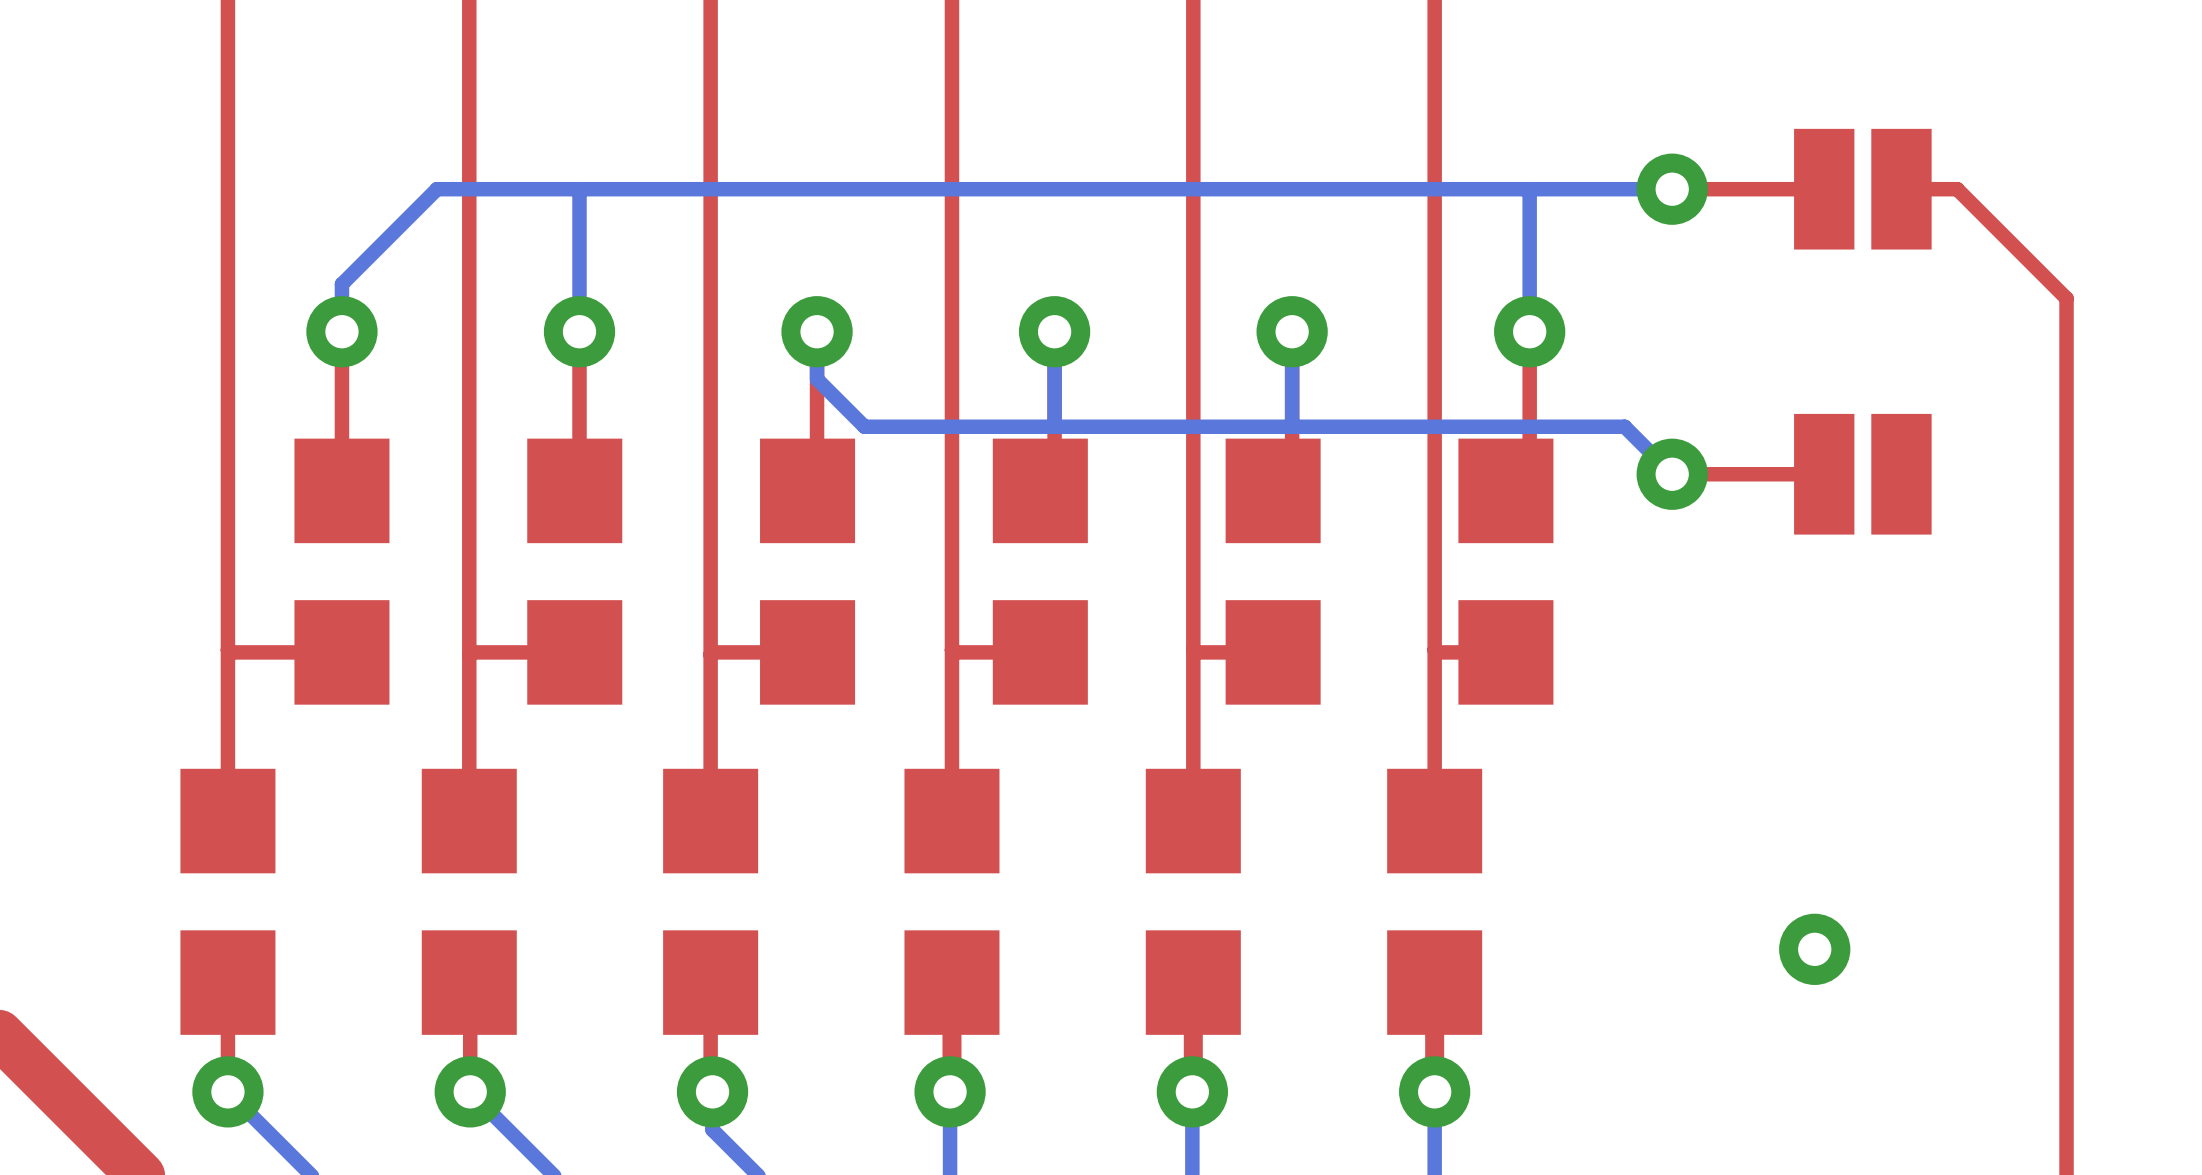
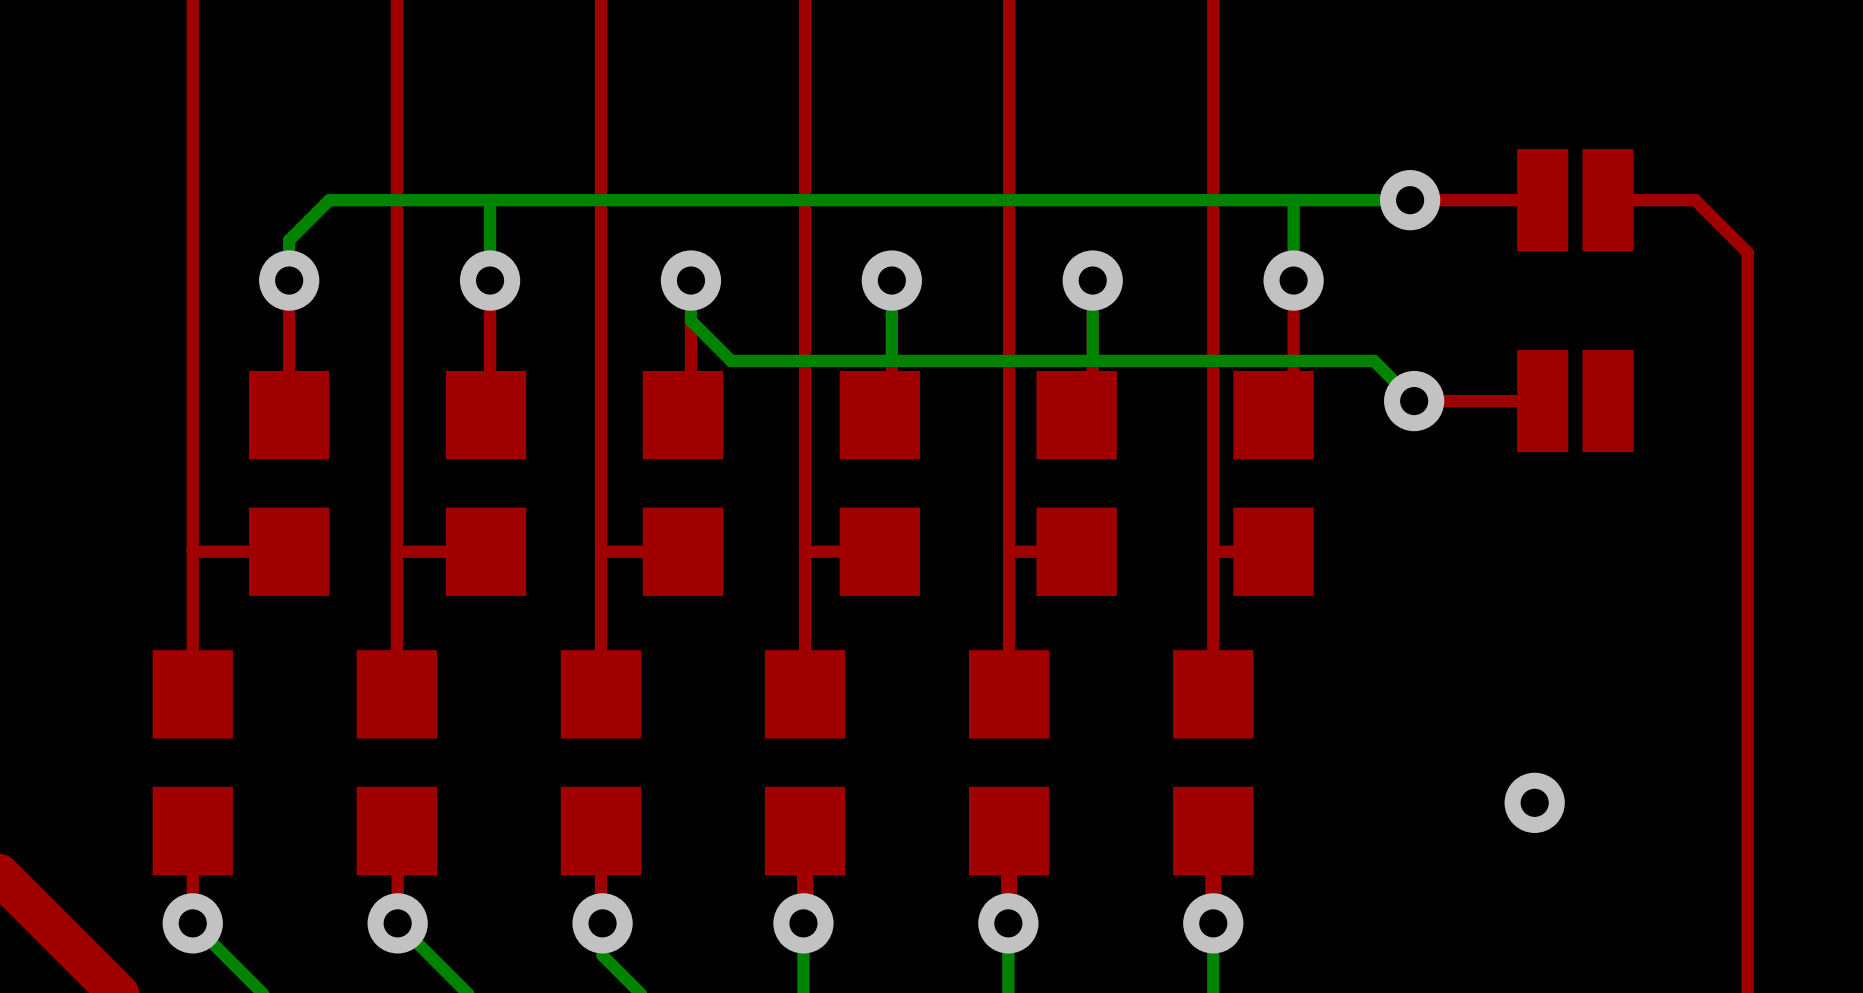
bottom track: (579, 189) (579, 236) -> none
bottom track: (1529, 189) (1529, 236) -> none
bottom track: (1672, 189) (436, 189) (389, 236) -> (1410, 200) (329, 200)
via position: (1672, 189) -> (1410, 200)
top track: (1824, 189) (1672, 189) -> none
part position: (1862, 189) -> (1575, 200)
top track: (1901, 189) (1957, 189) (2004, 236) -> (1608, 200) (1695, 200)
top track: none -> (1542, 200) (1410, 200)

